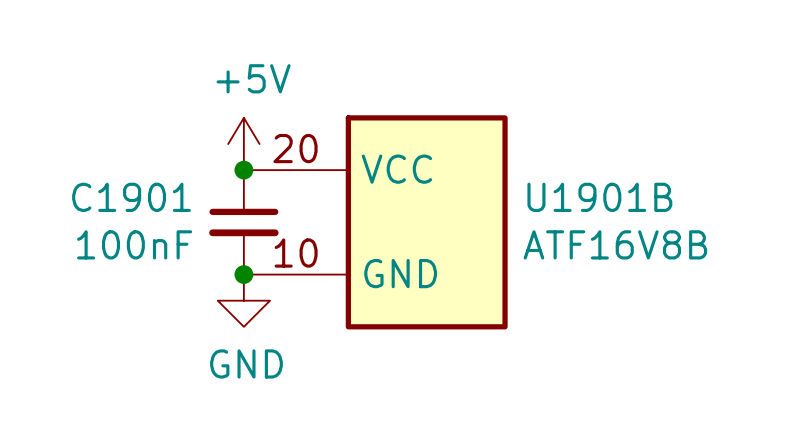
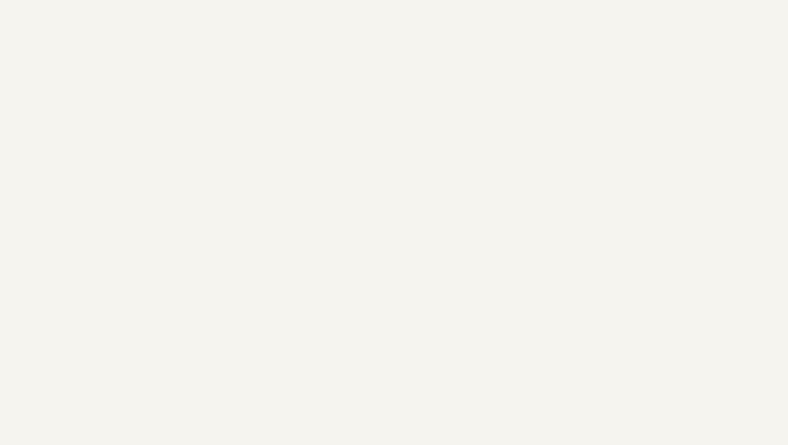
power symbol: +5V (243, 144) -> none
junction: (243, 170) -> none
C1901: 100nF (243, 222) -> none
U1901B: ATF16V8B (375, 222) -> none
junction: (243, 274) -> none
power symbol: GND (243, 300) -> none

